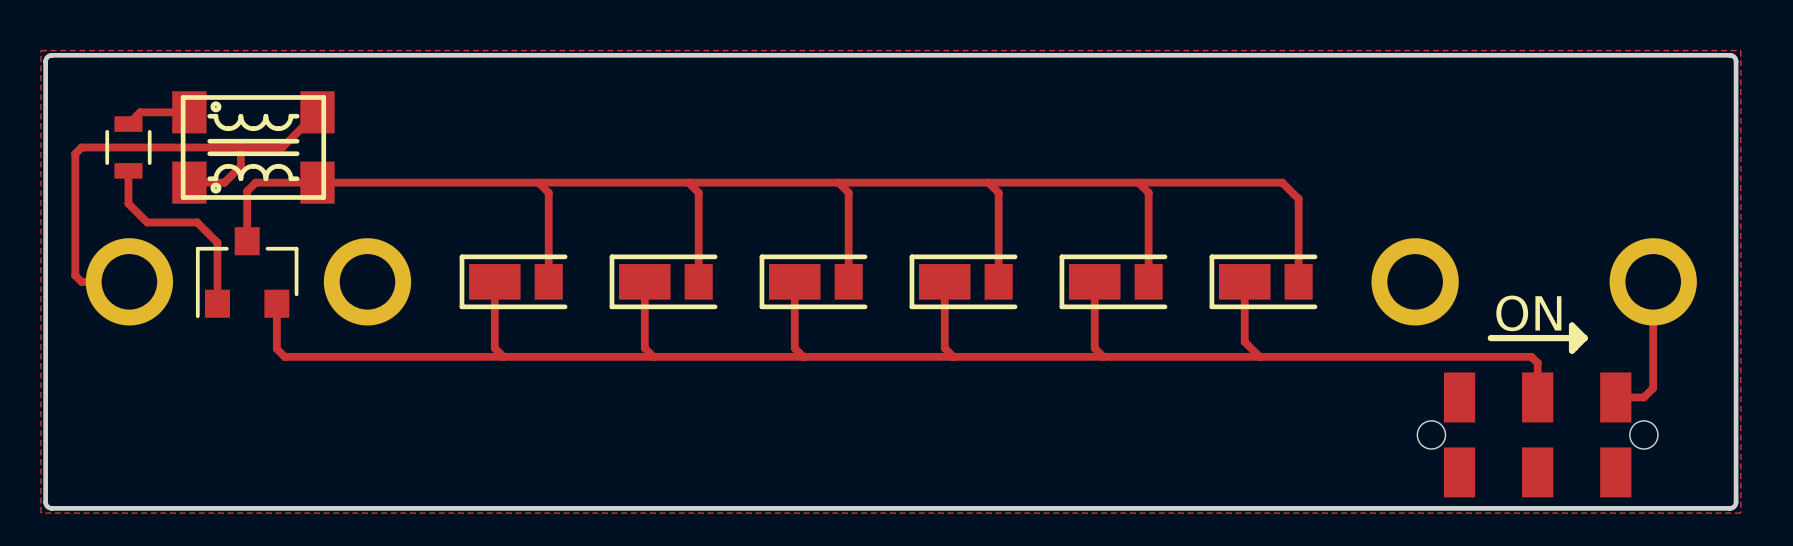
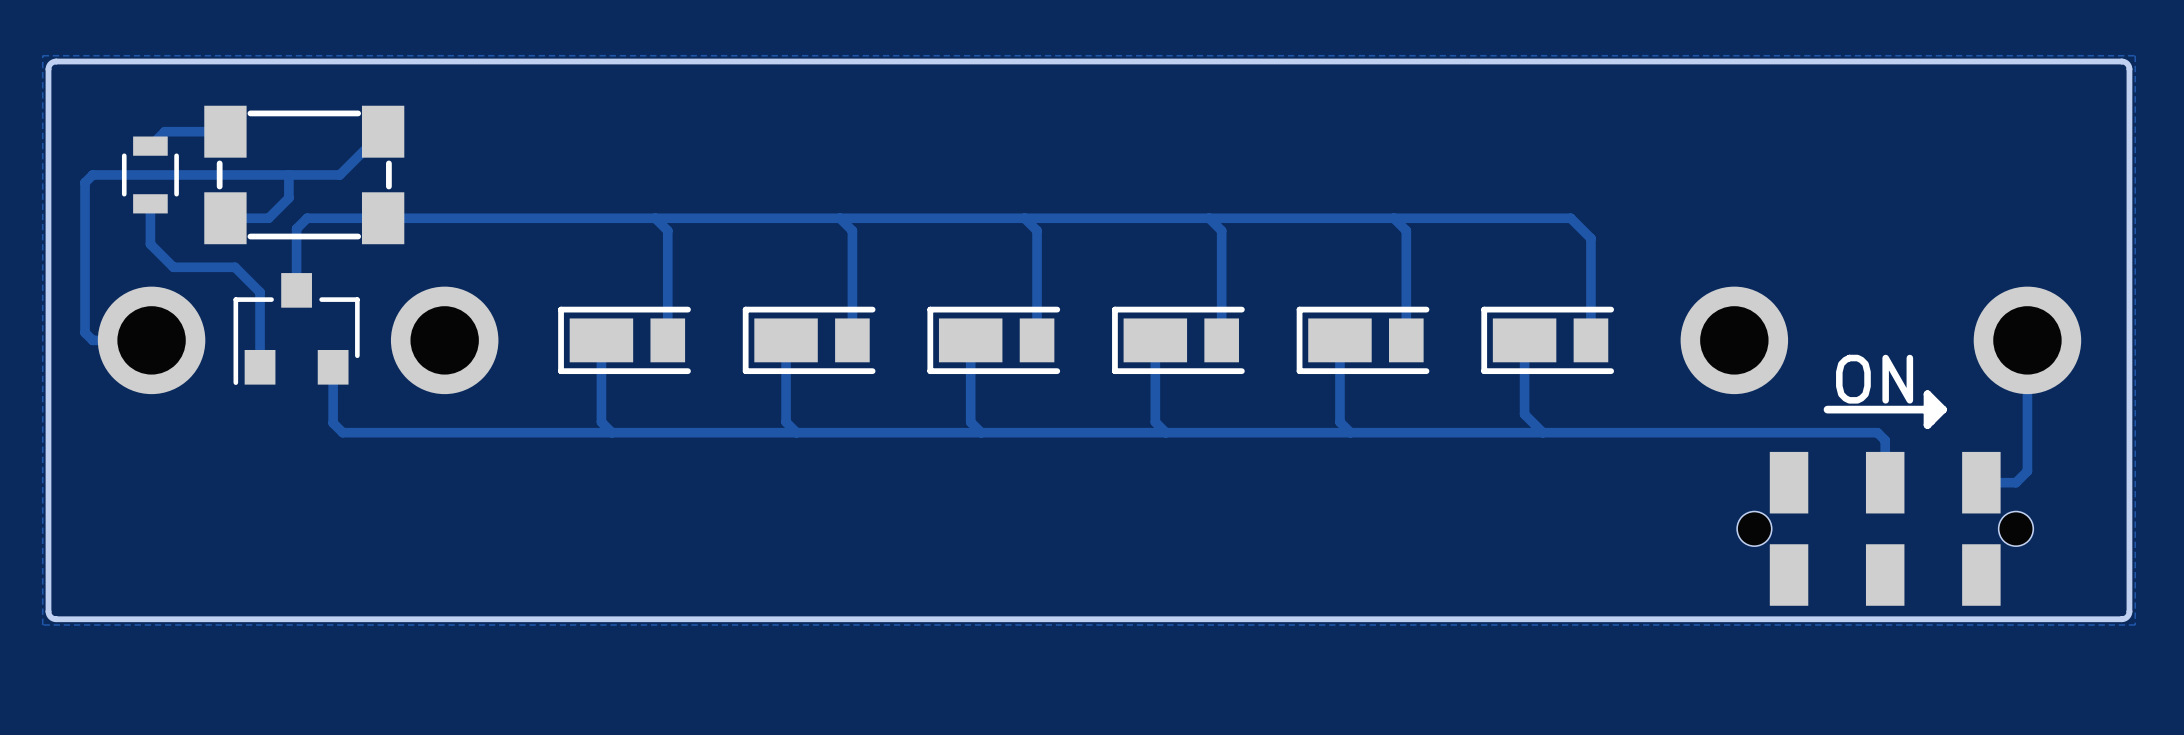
part footprint: [172, 91, 335, 204] -> [204, 105, 405, 245]

